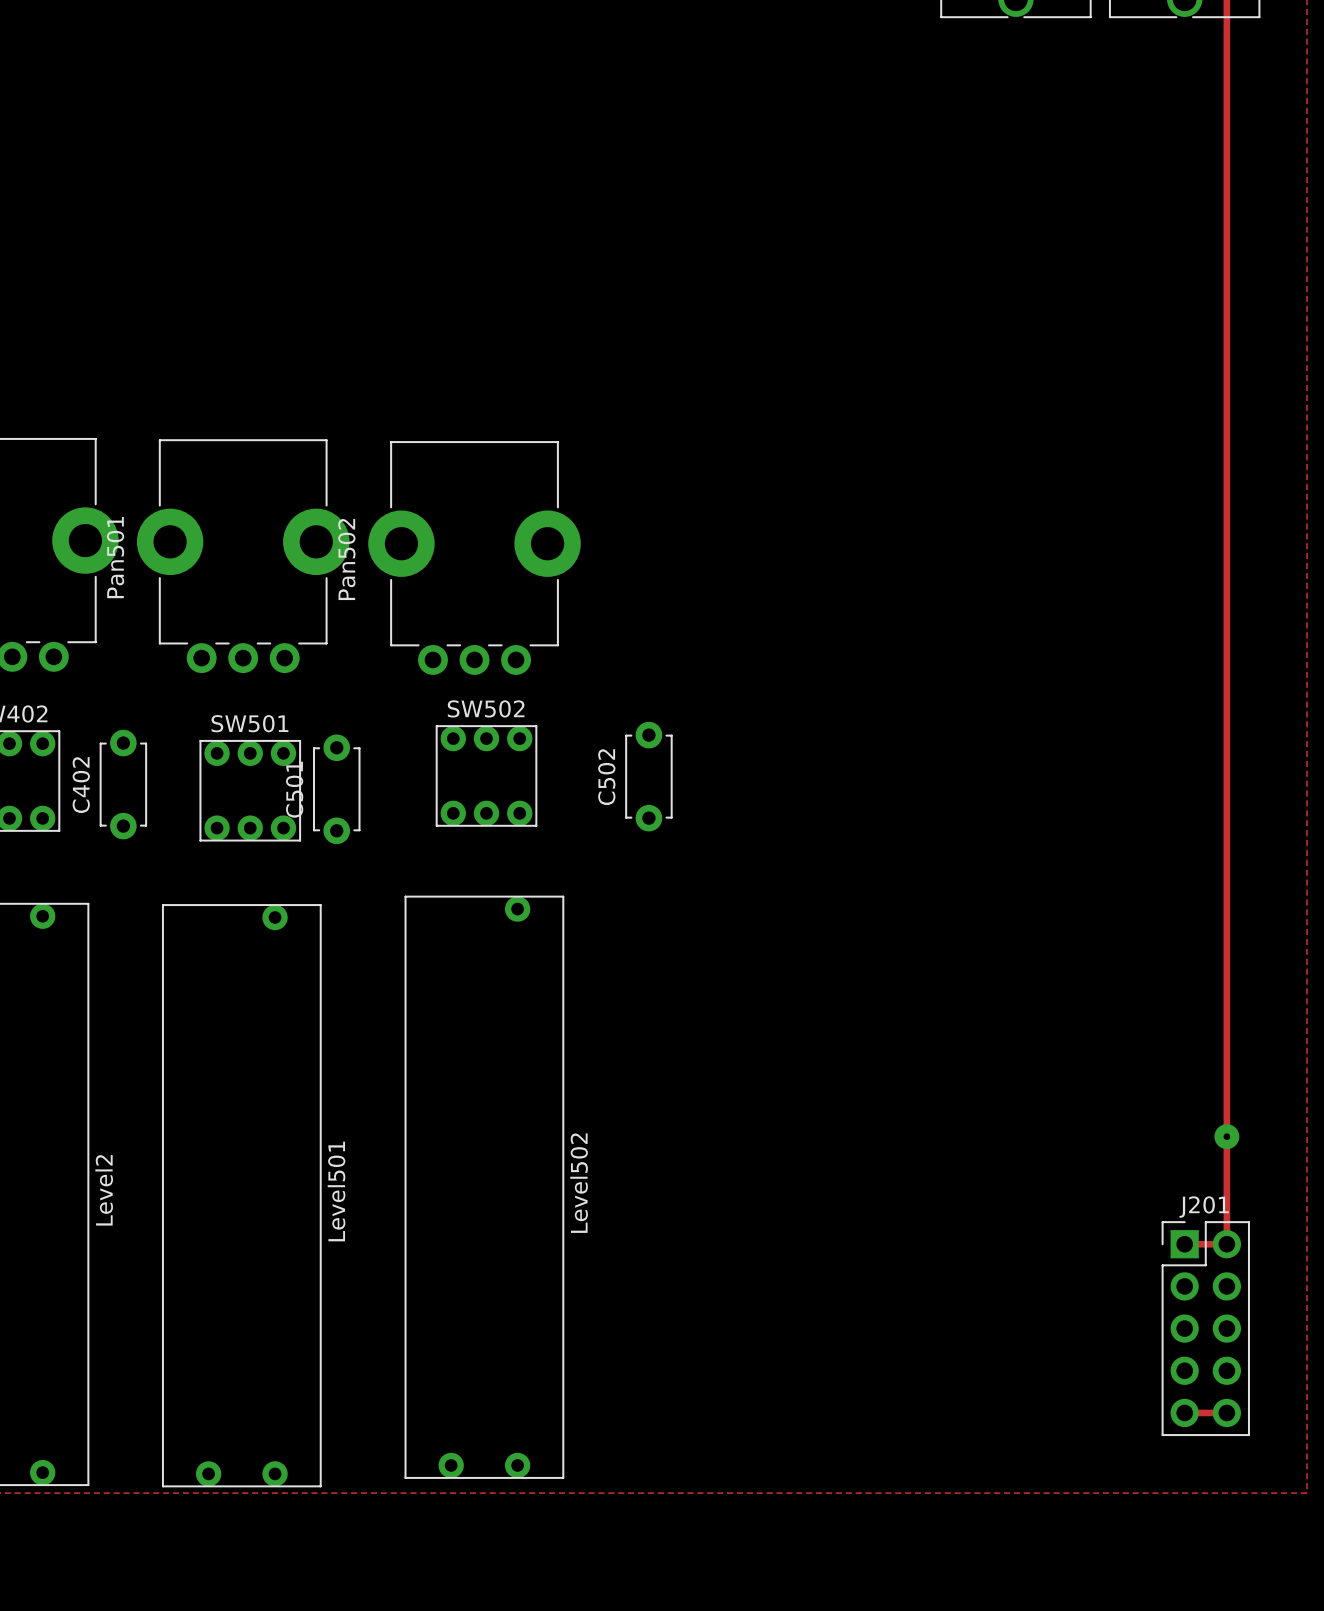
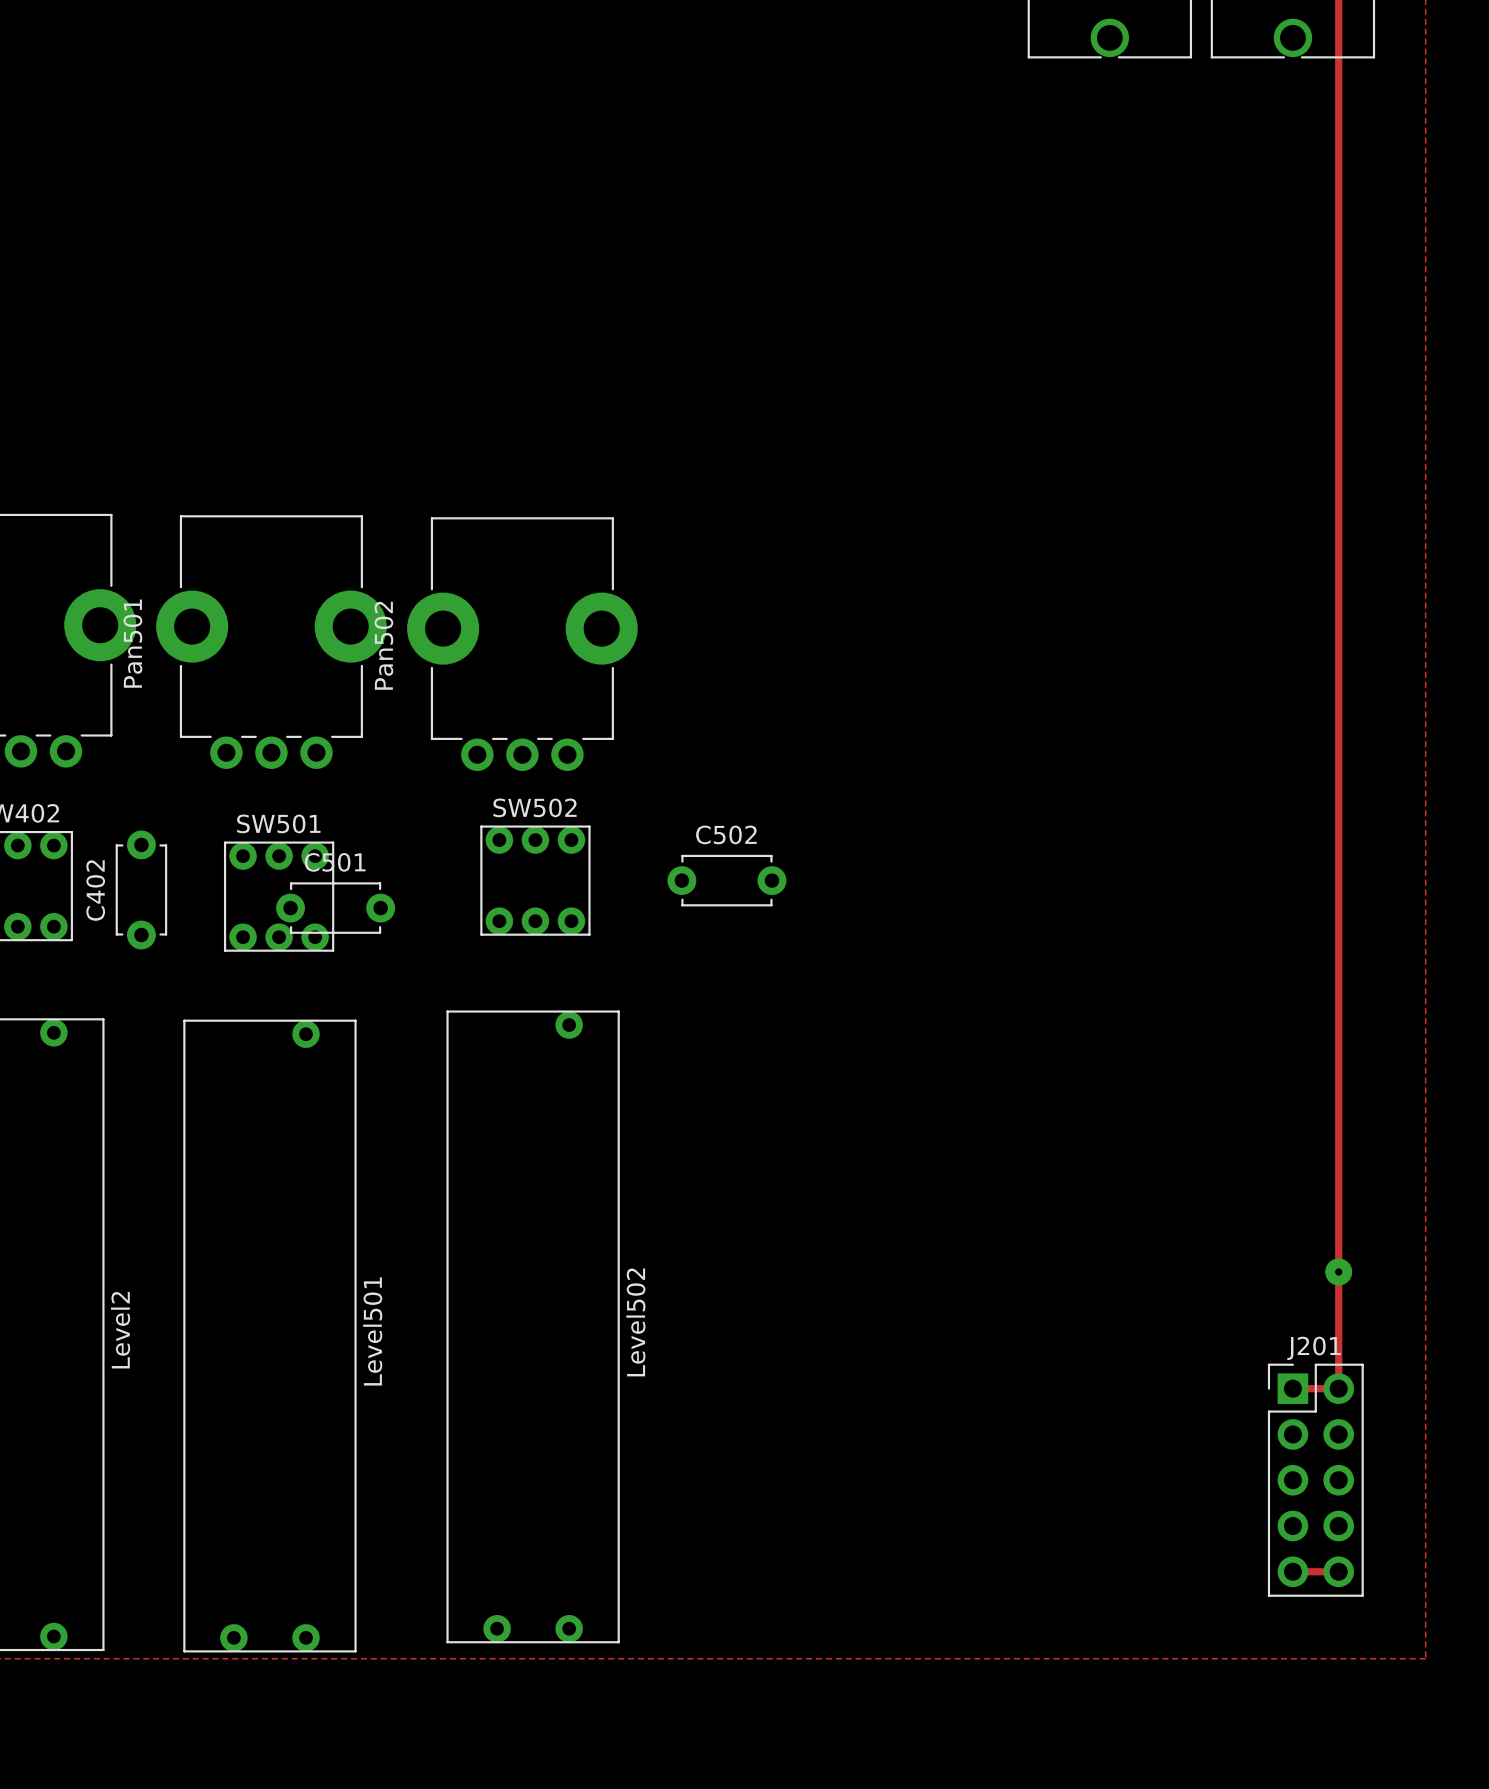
C502 rotation: 0° (648, 776) -> 90° clockwise (726, 880)
C501 rotation: 0° (336, 789) -> 90° clockwise (335, 908)

